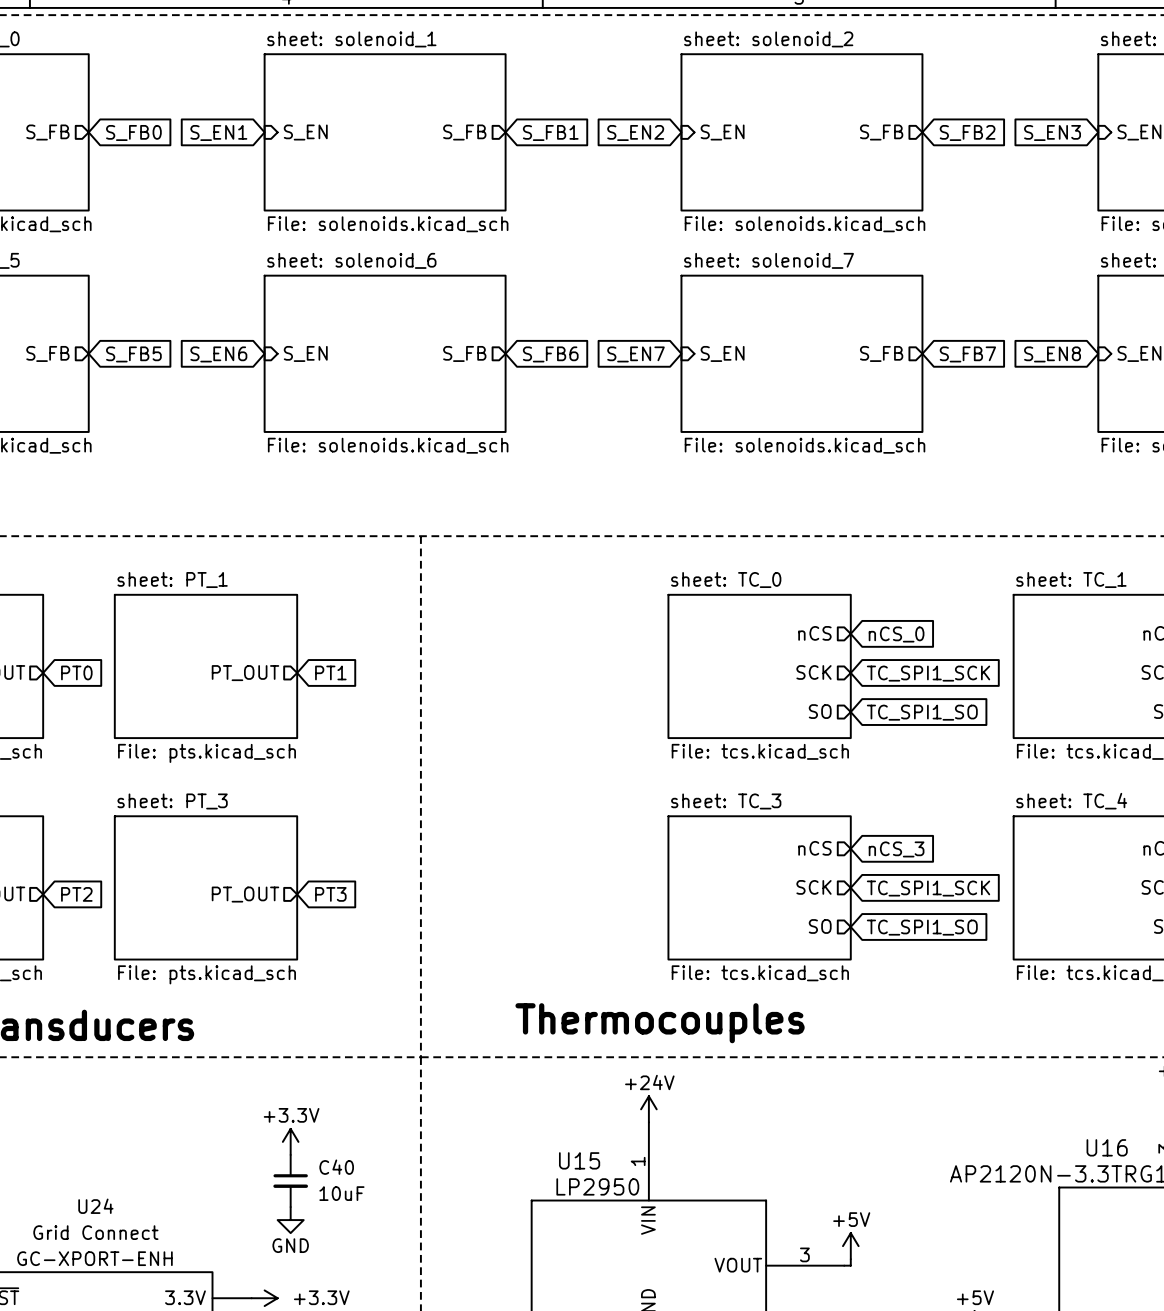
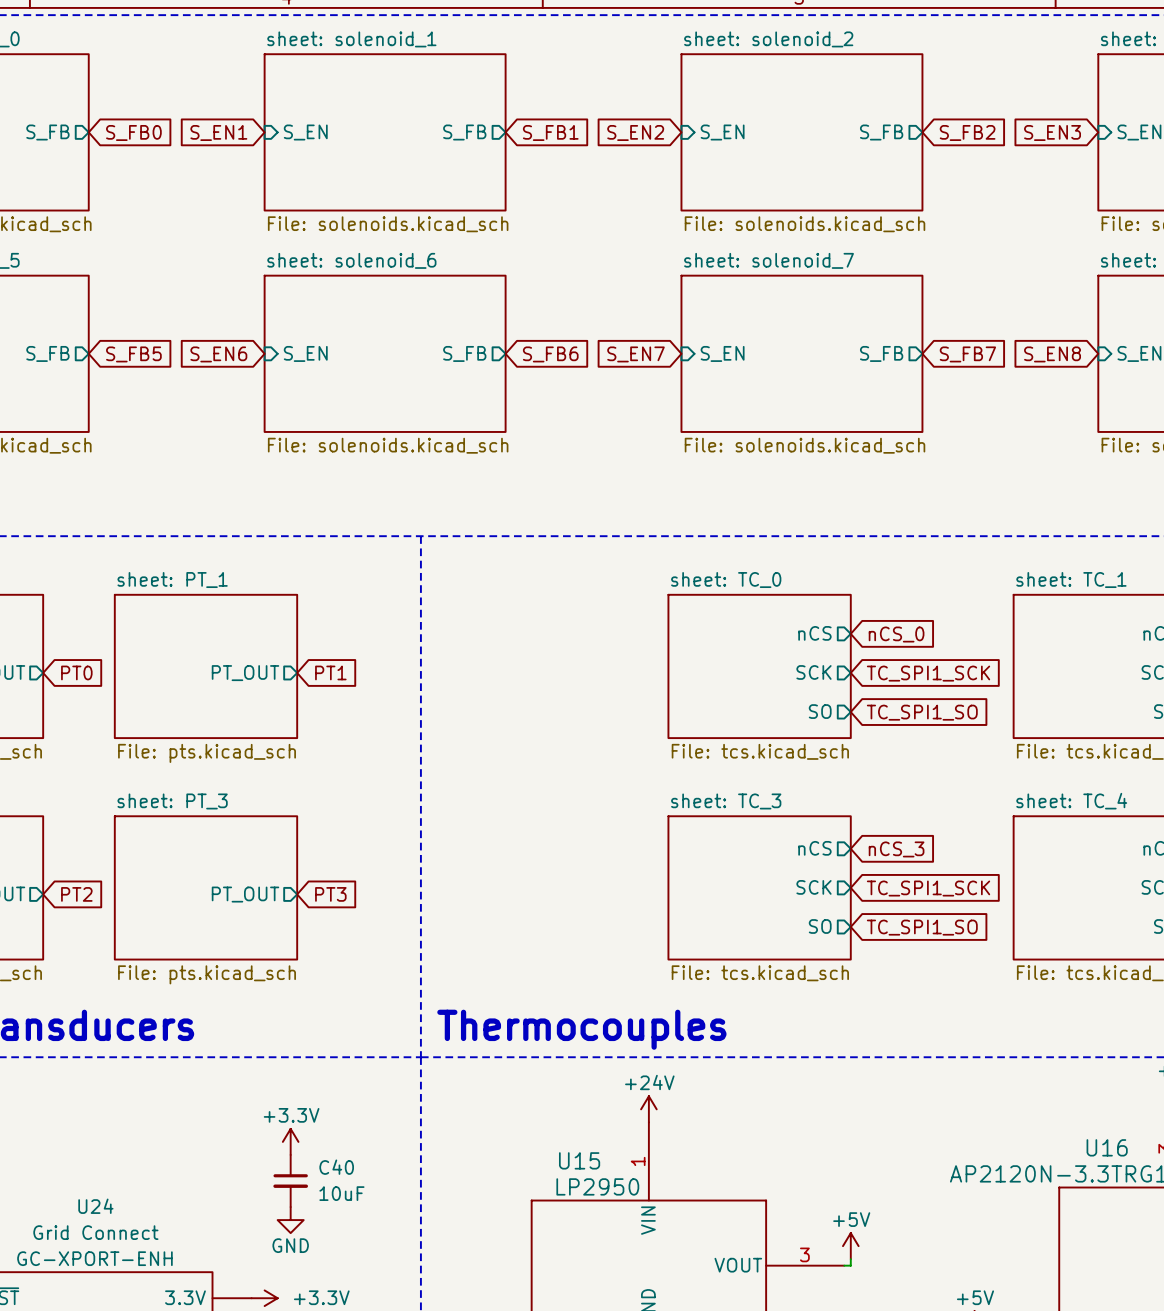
text position: Thermocouples (660, 1023) -> Thermocouples (581, 1029)

